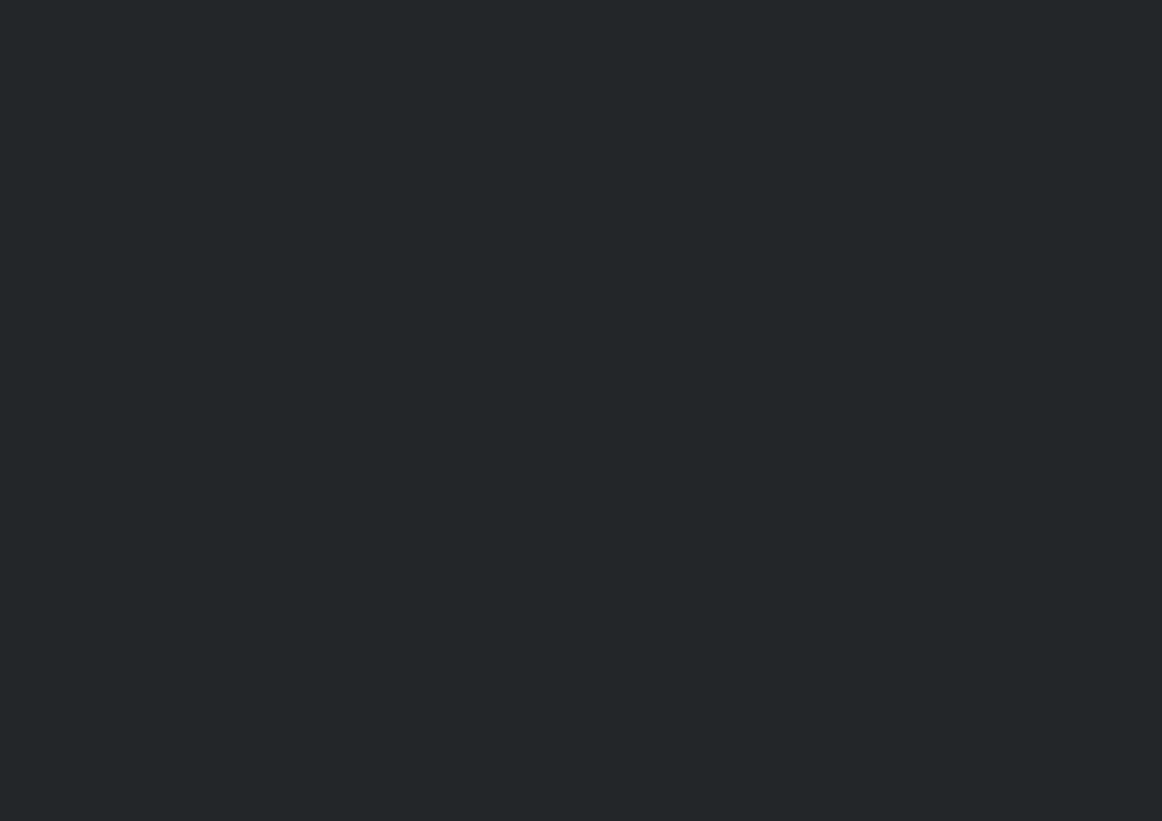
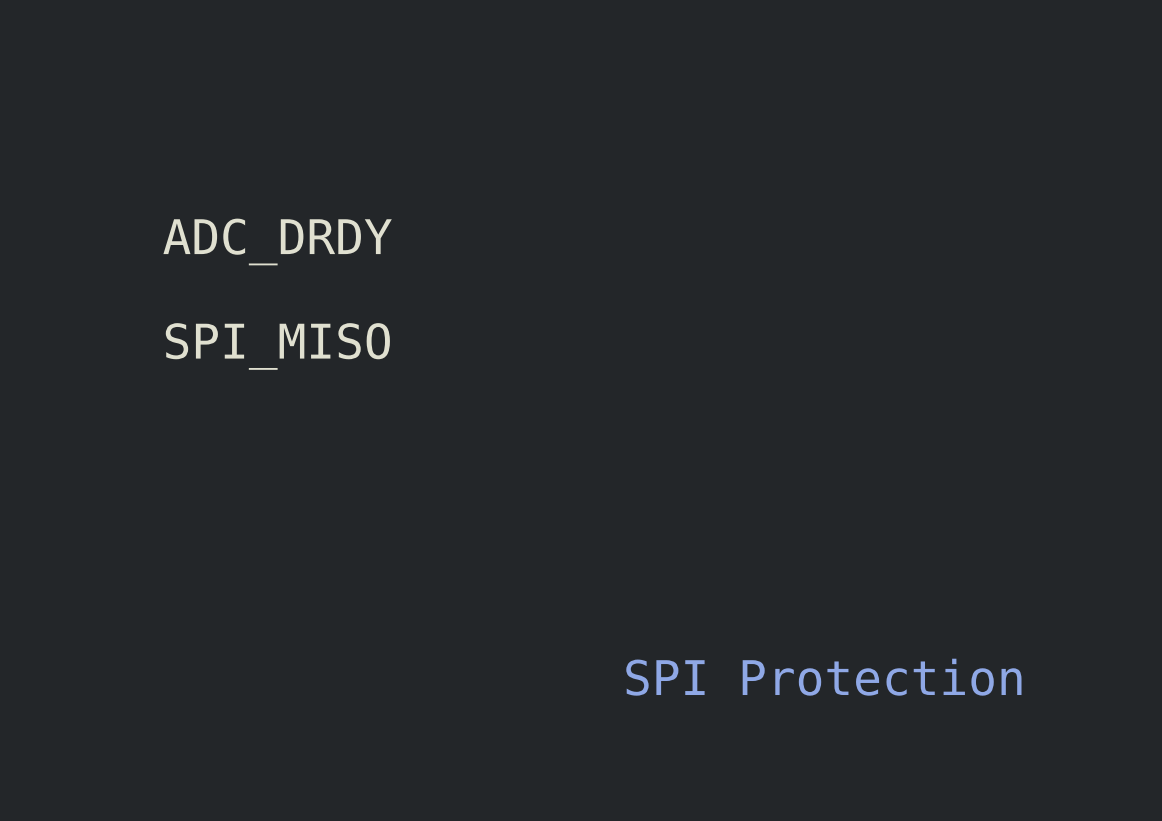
label: none -> ADC_DRDY (277, 241)
label: none -> SPI_MISO (277, 346)
text: none -> SPI Protection (823, 677)

